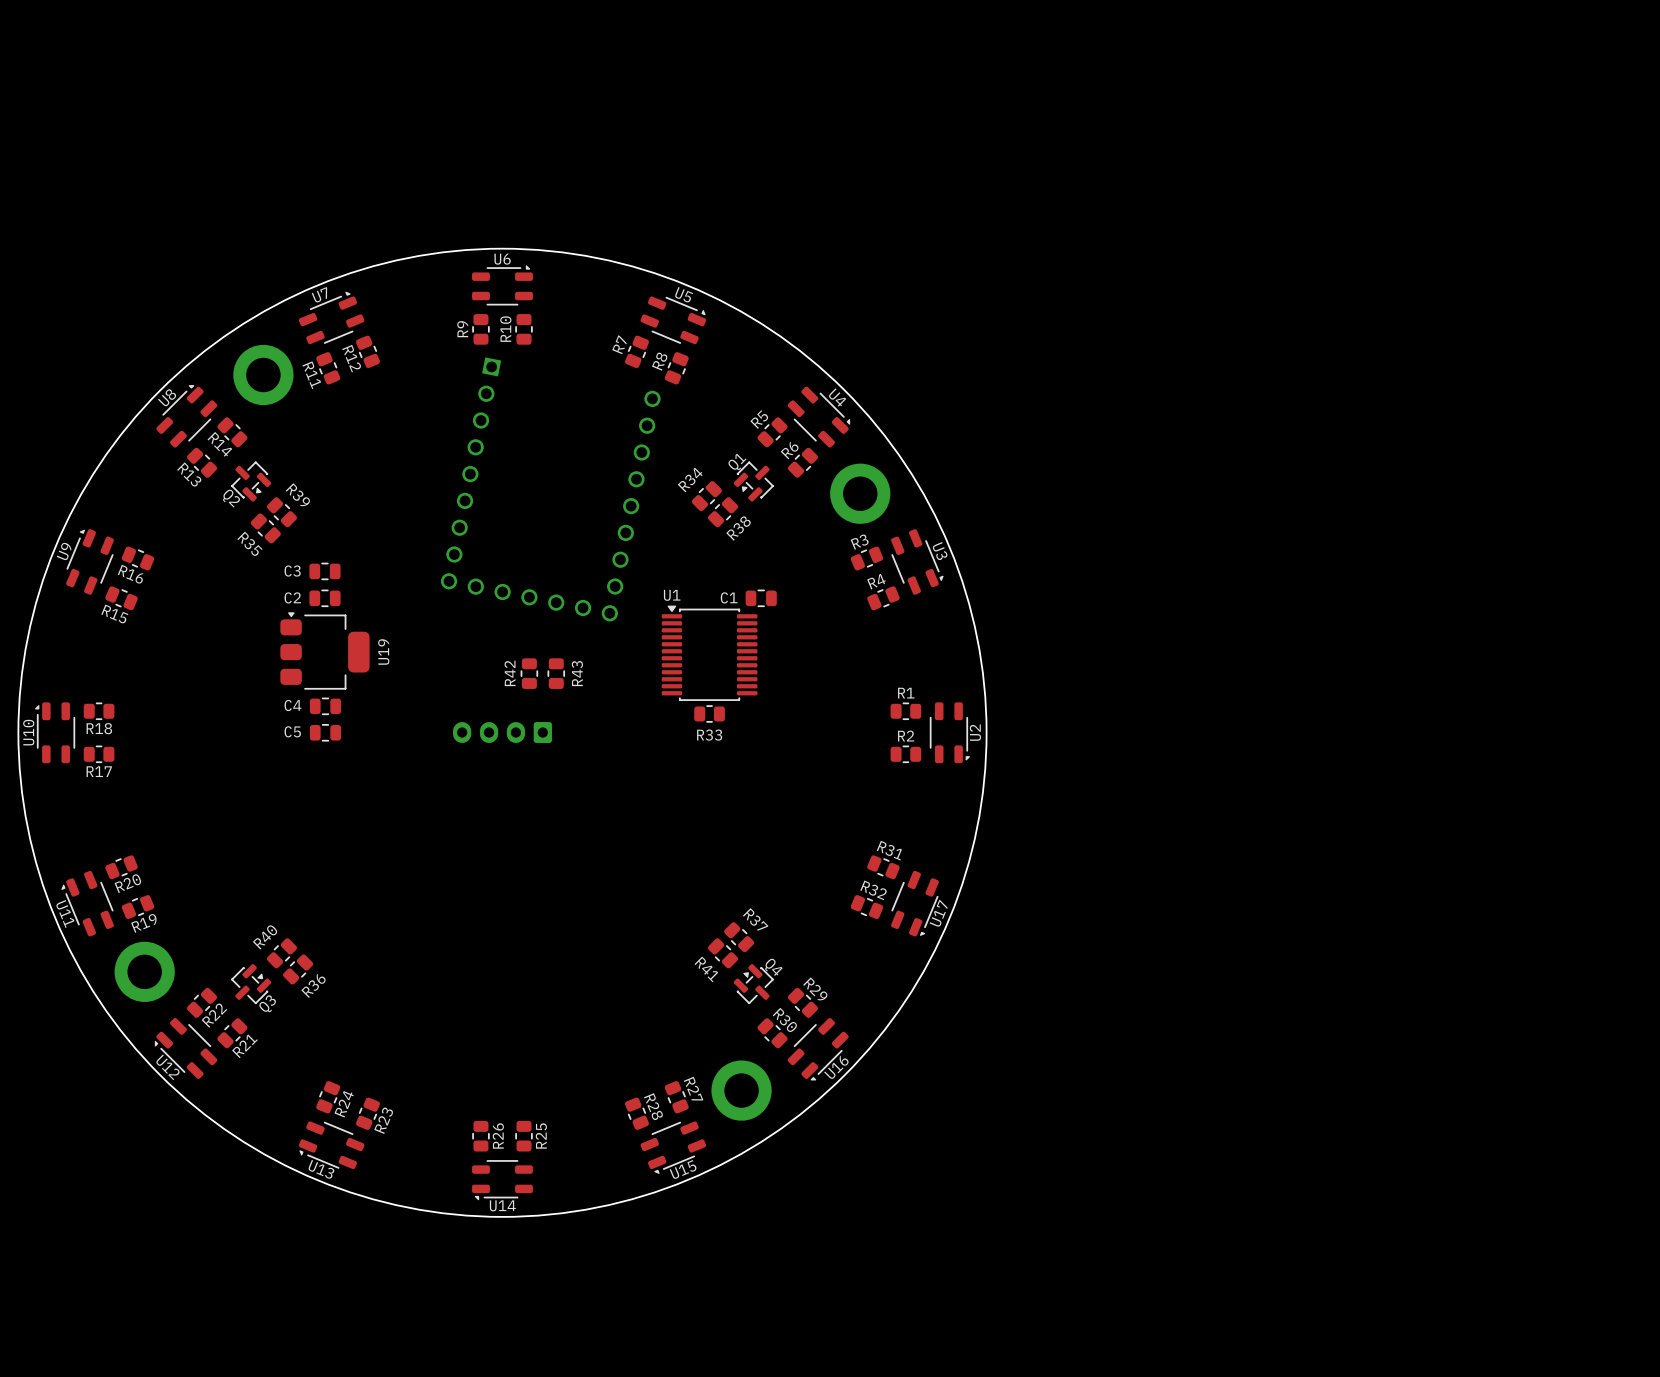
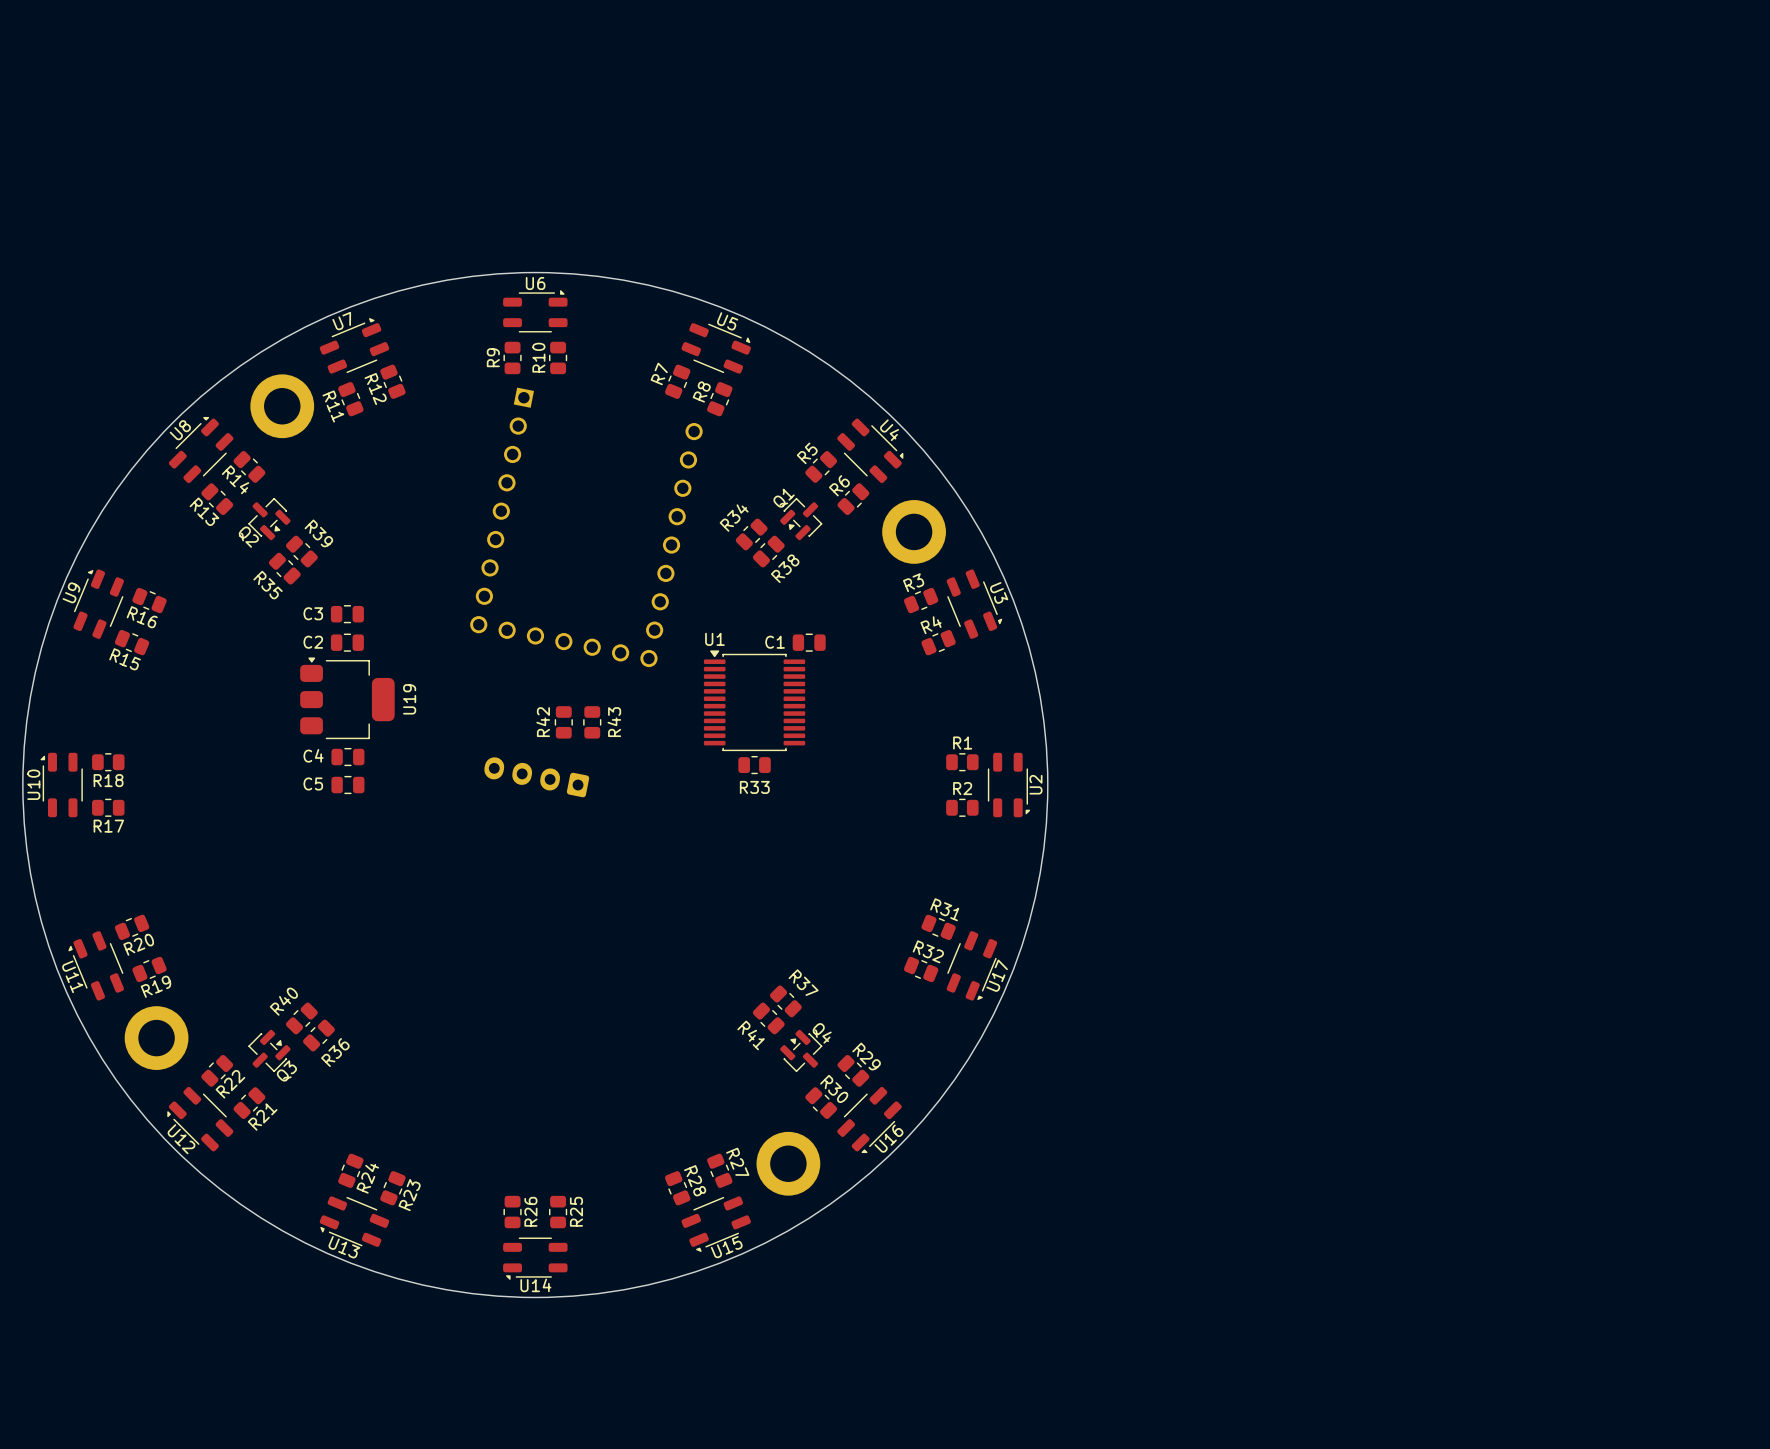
part footprint: [453, 722, 552, 744] -> [484, 757, 590, 798]

